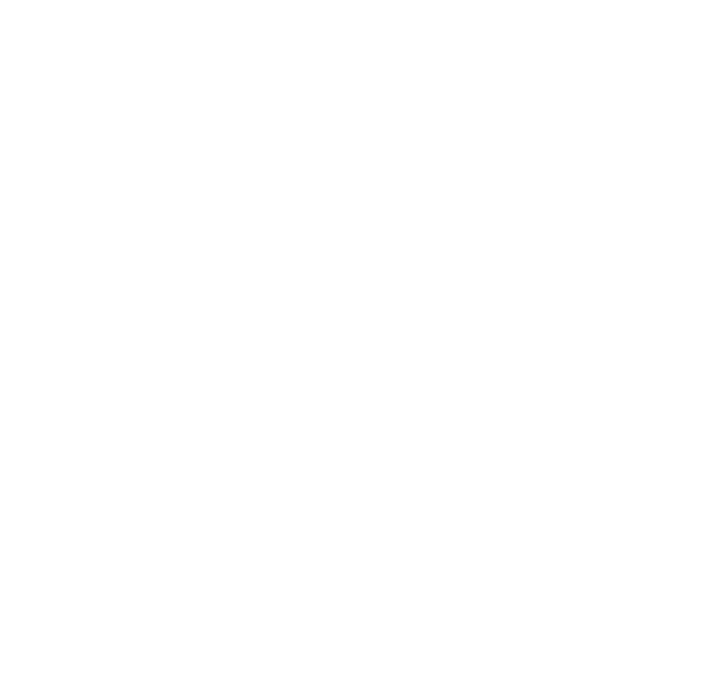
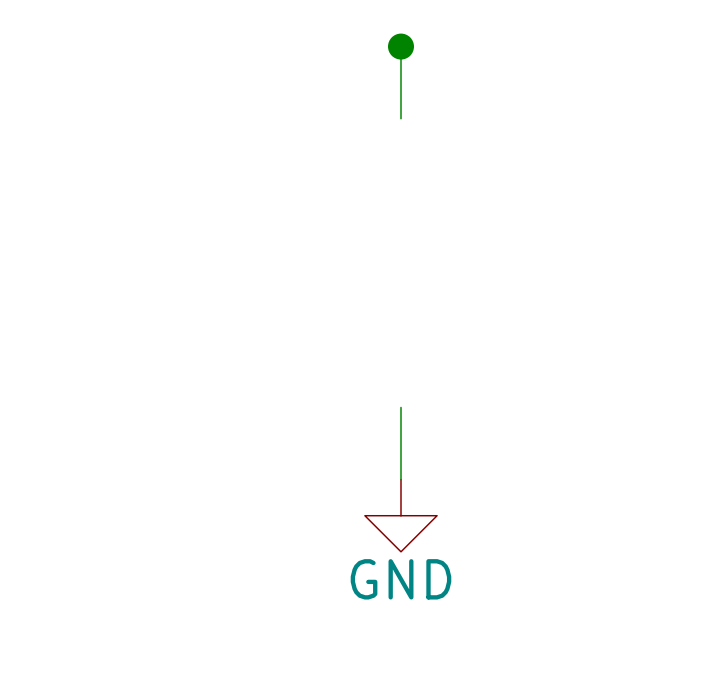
wire: none -> (400, 46) (400, 118)
junction: none -> (400, 46)
wire: none -> (400, 407) (400, 479)
power symbol: none -> GND (400, 515)

